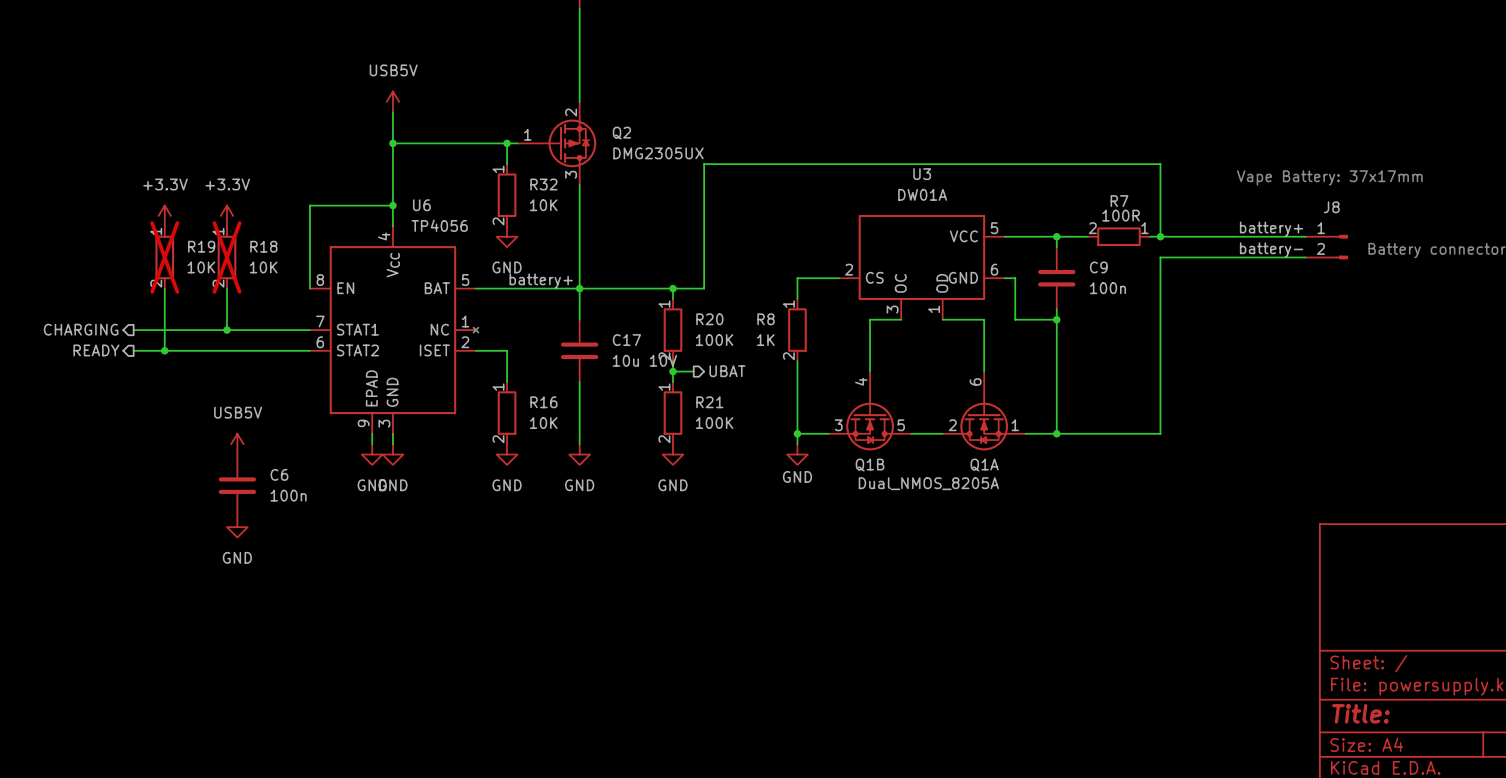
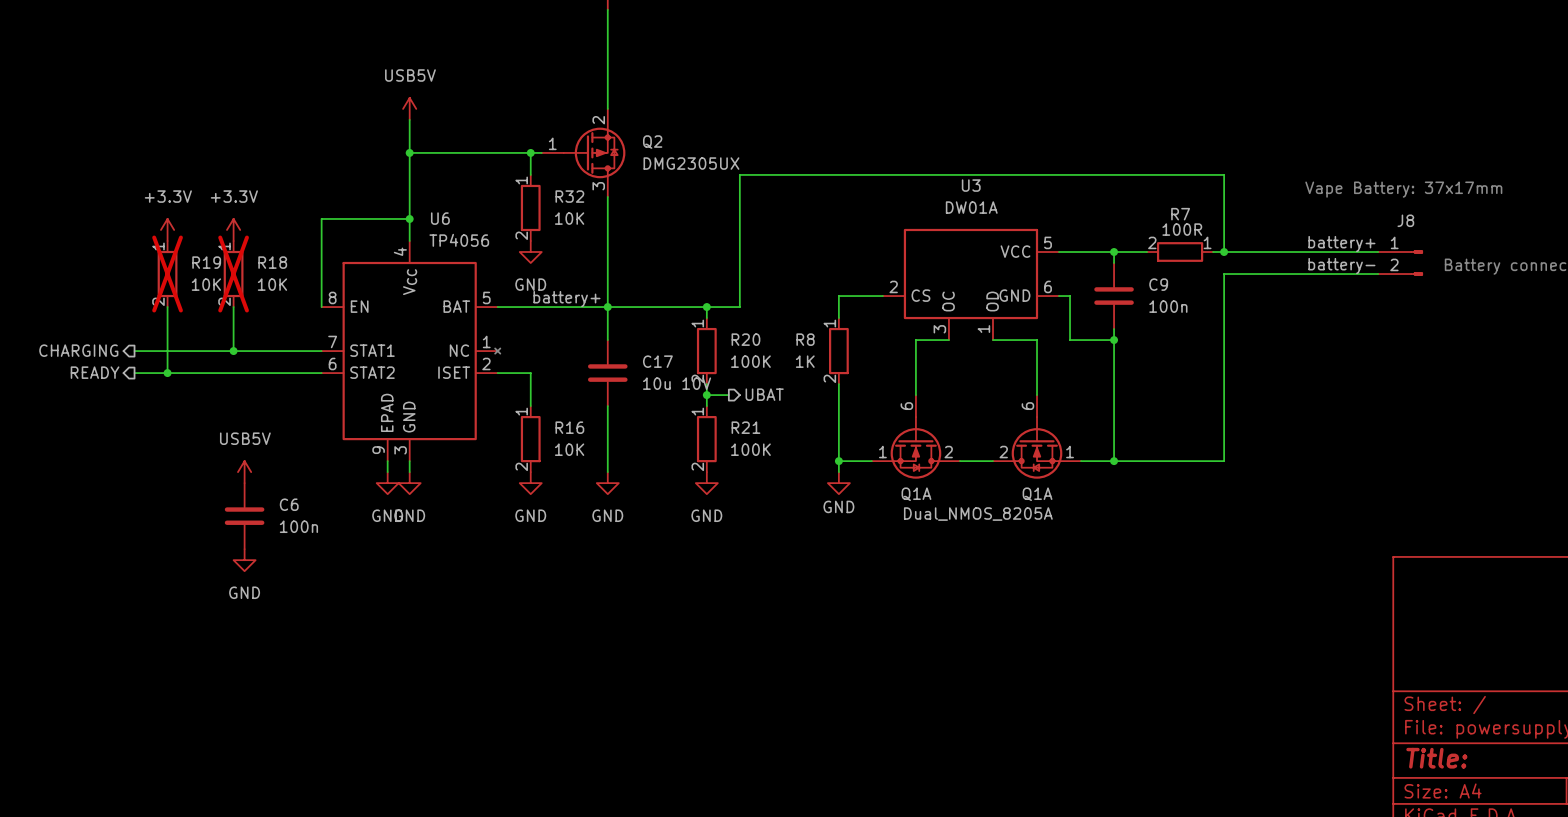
Q1B pin number: 4 (861, 381) -> 6 (906, 406)
Q1B pin number: 3 (838, 425) -> 1 (882, 452)
Q1B pin number: 5 (901, 425) -> 2 (948, 452)
Q1B name: Q1B (870, 465) -> Q1A (916, 494)

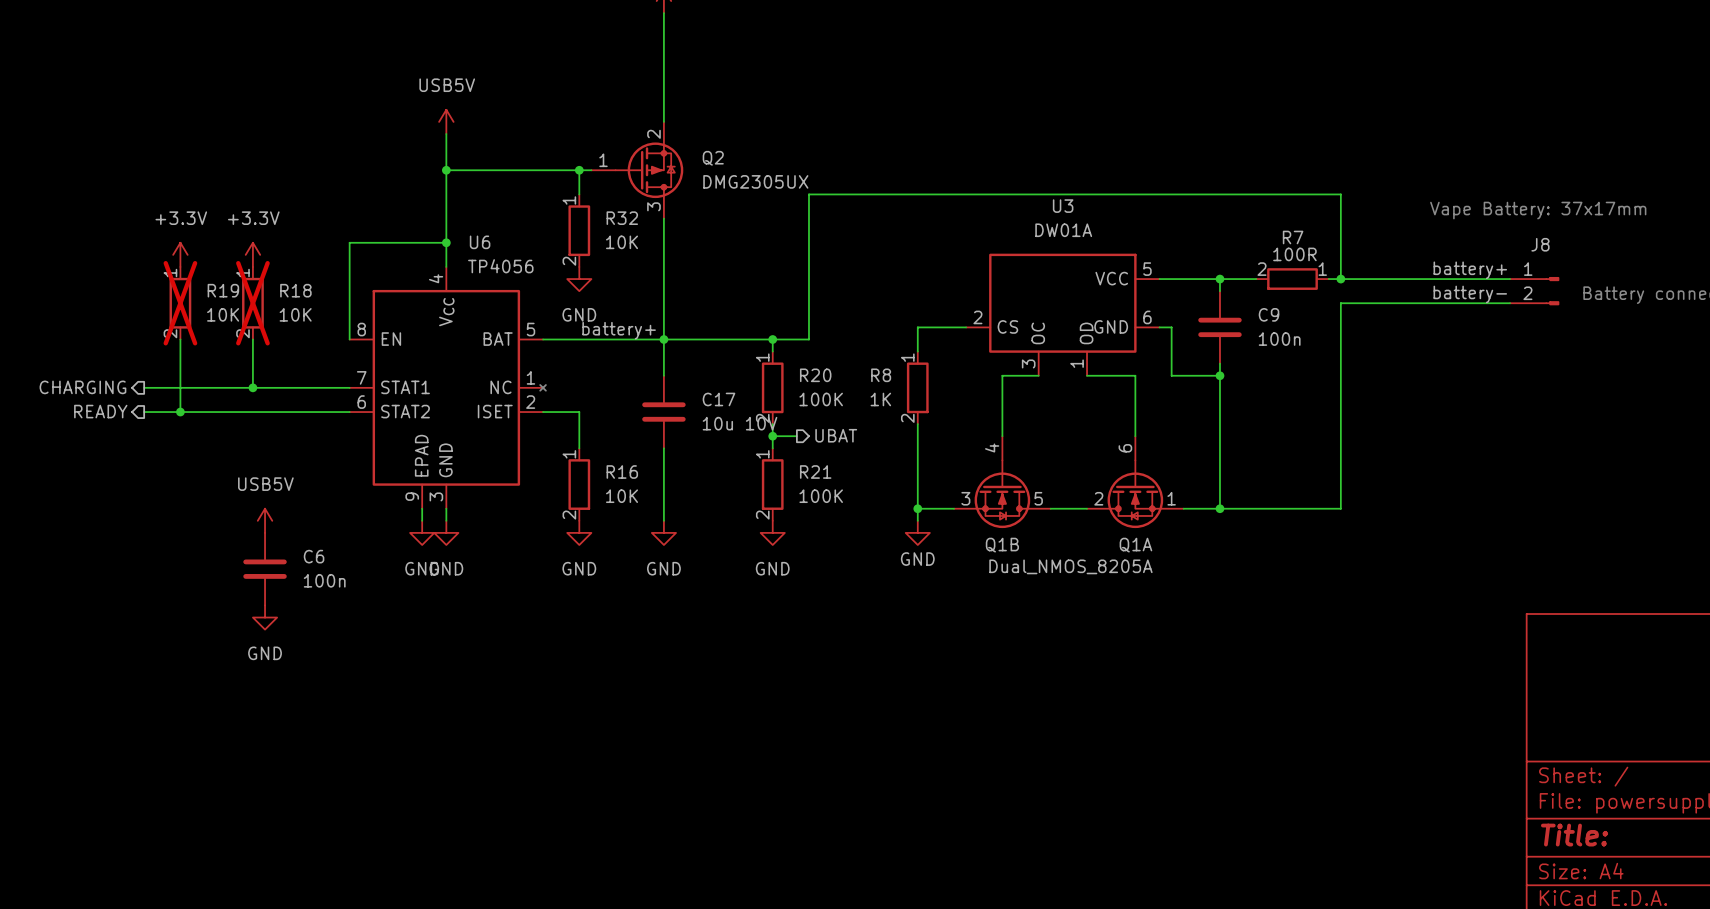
Q1A pin number: 6 (906, 406) -> 4 (992, 448)
Q1A pin number: 1 (882, 452) -> 3 (965, 498)
Q1A pin number: 2 (948, 452) -> 5 (1038, 498)
Q1A name: Q1A (916, 494) -> Q1B (1002, 545)

